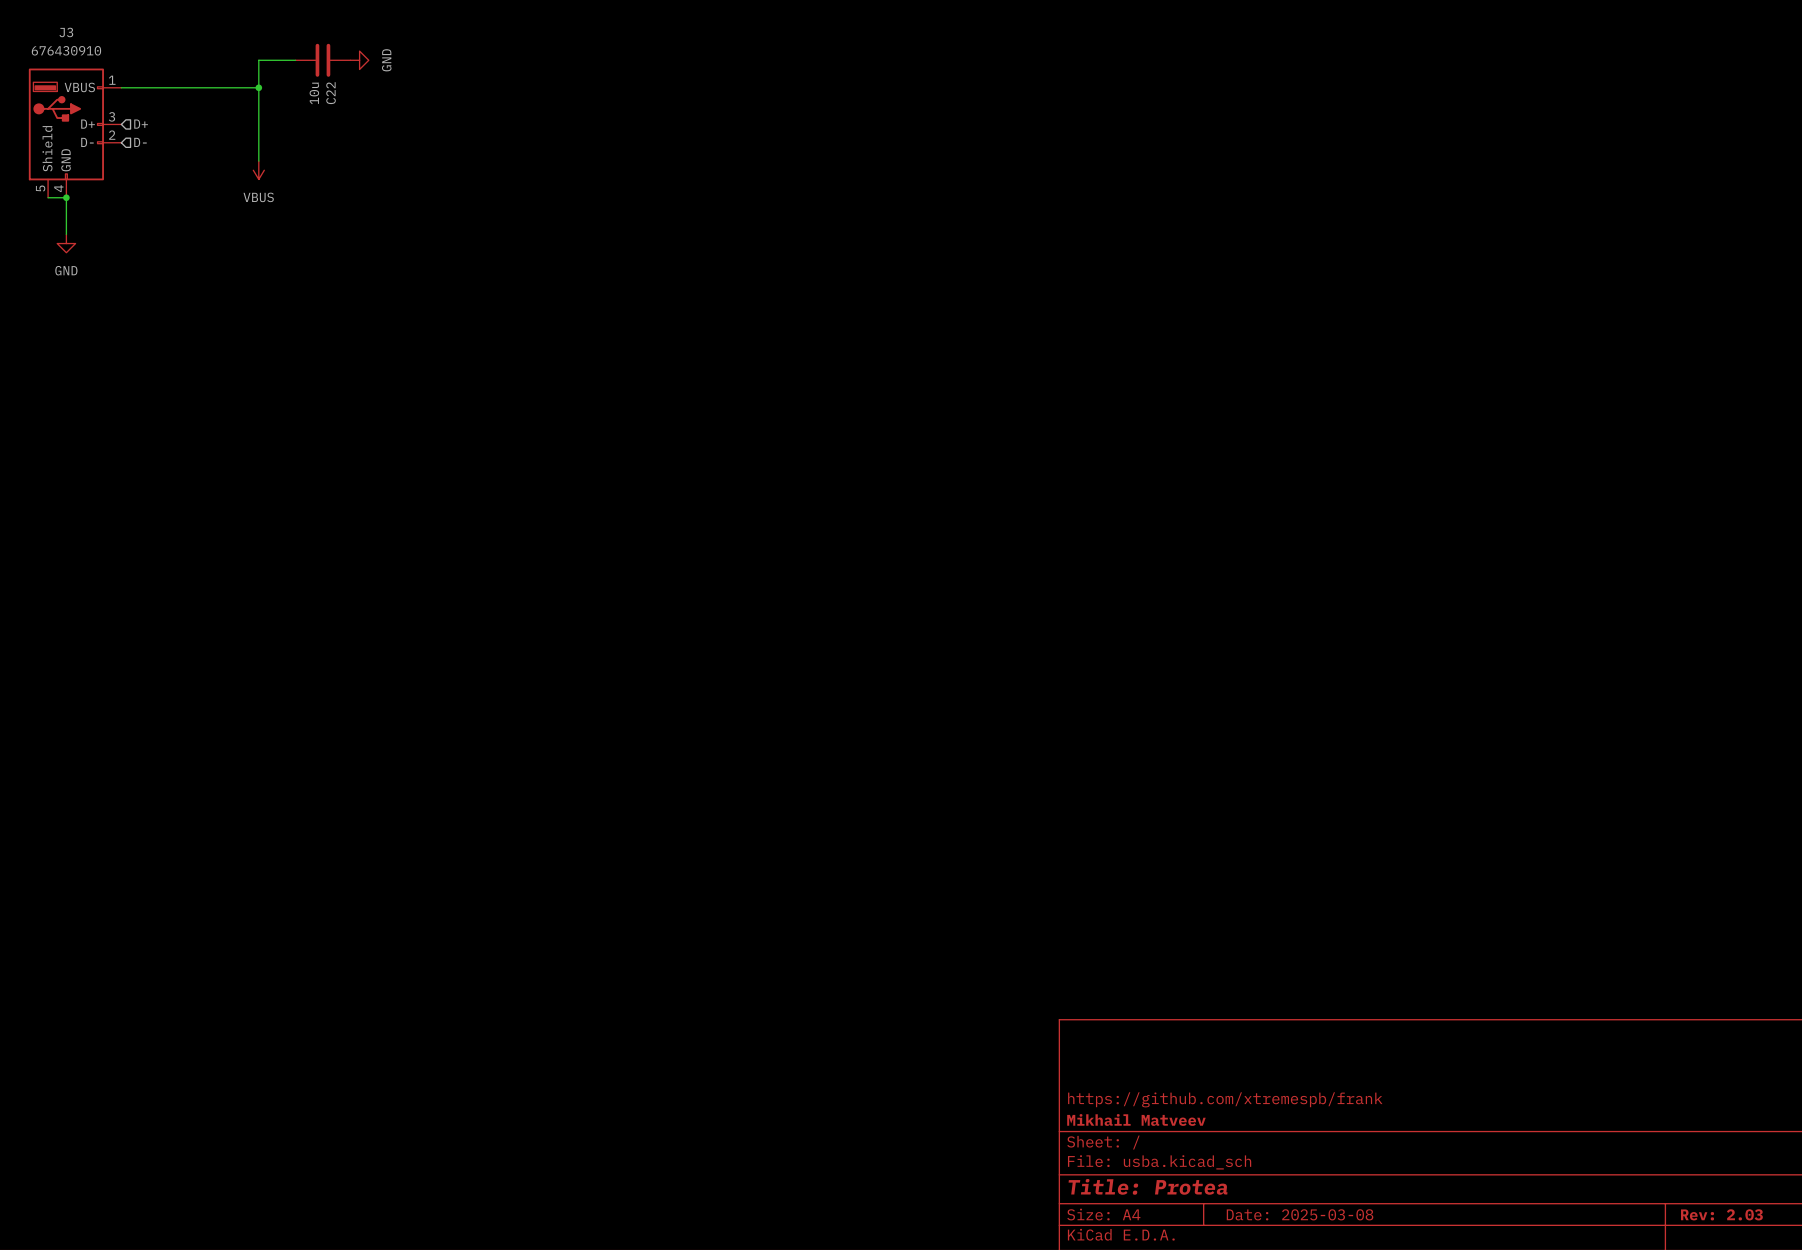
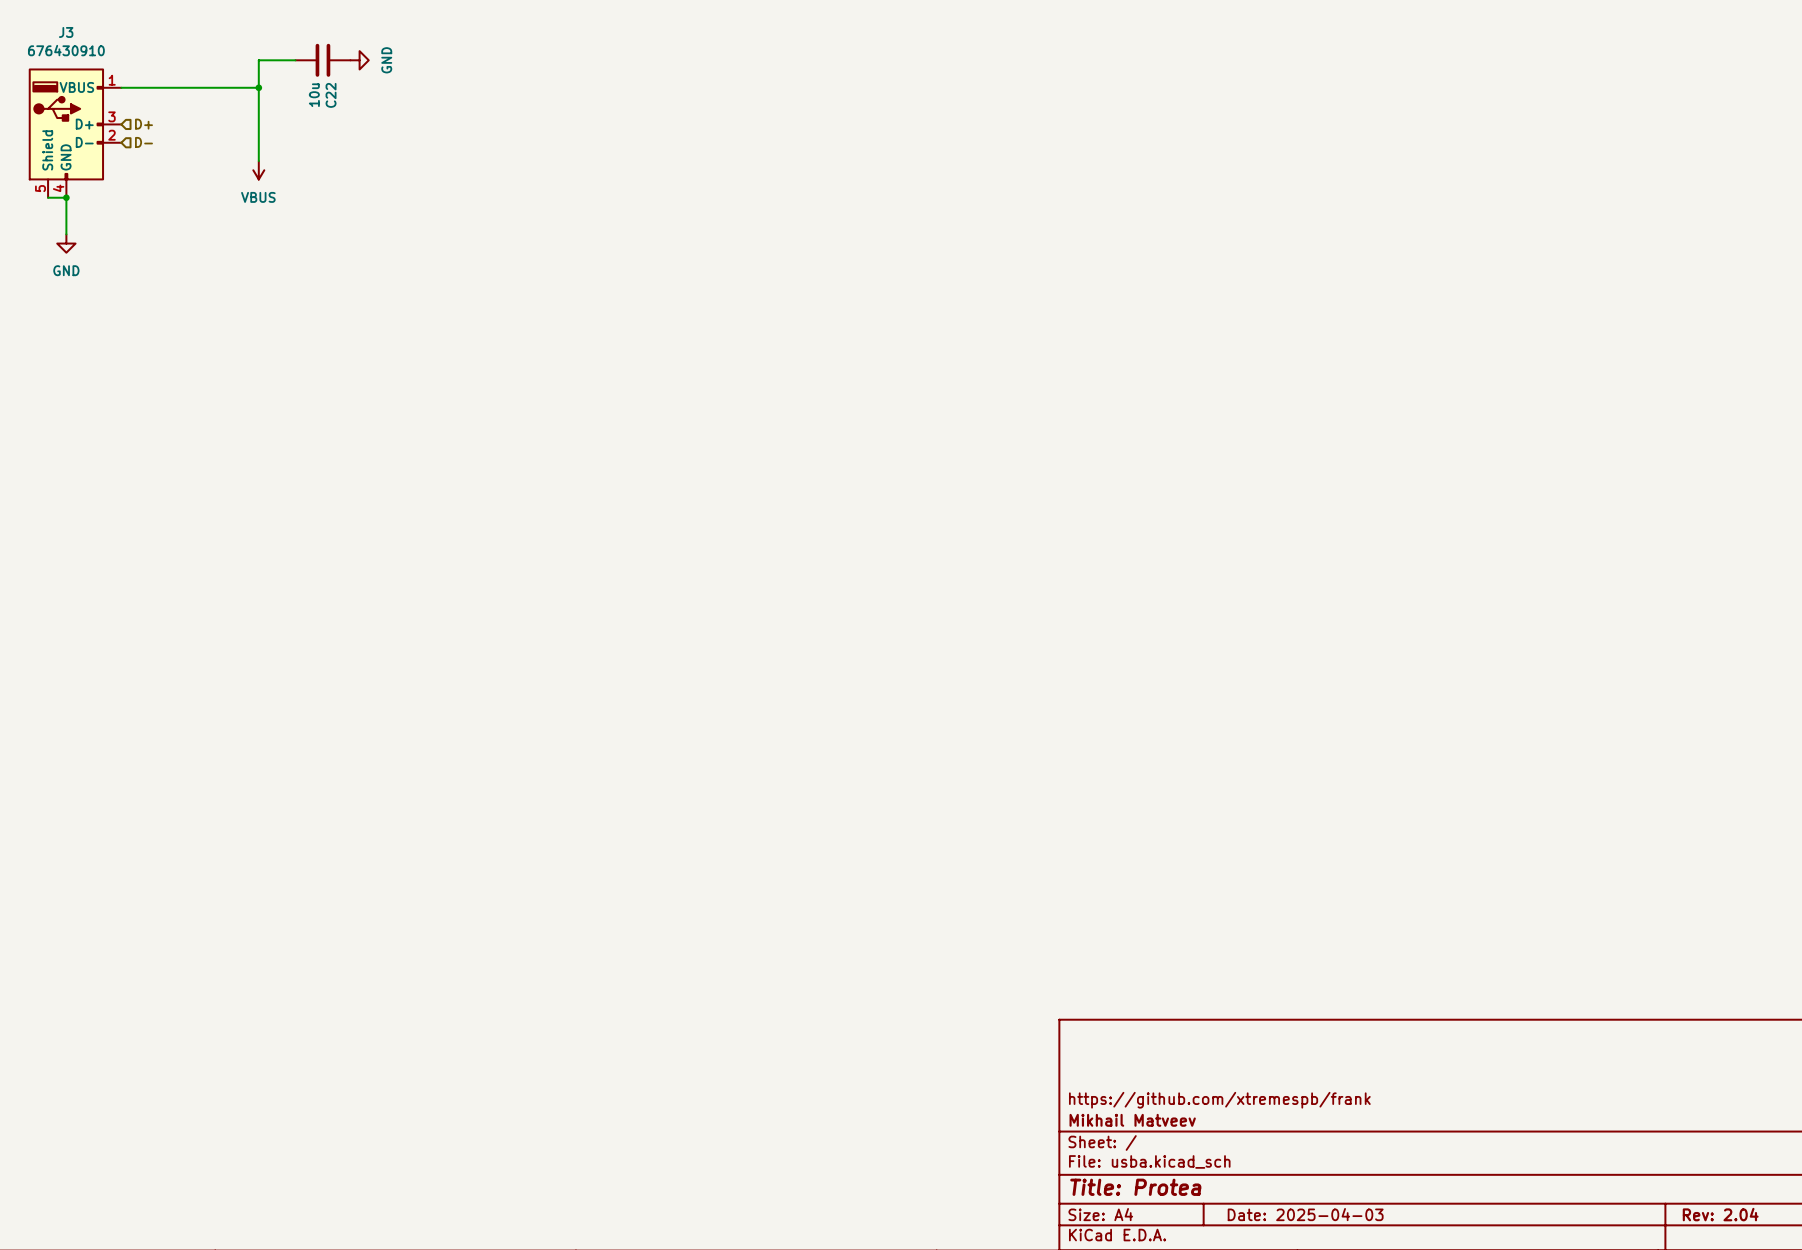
title block: Date: 2025-03-08 (1300, 1214) -> Date: 2025-04-03 (1305, 1214)
title block: Rev: 2.03 (1721, 1214) -> Rev: 2.04 (1720, 1214)

